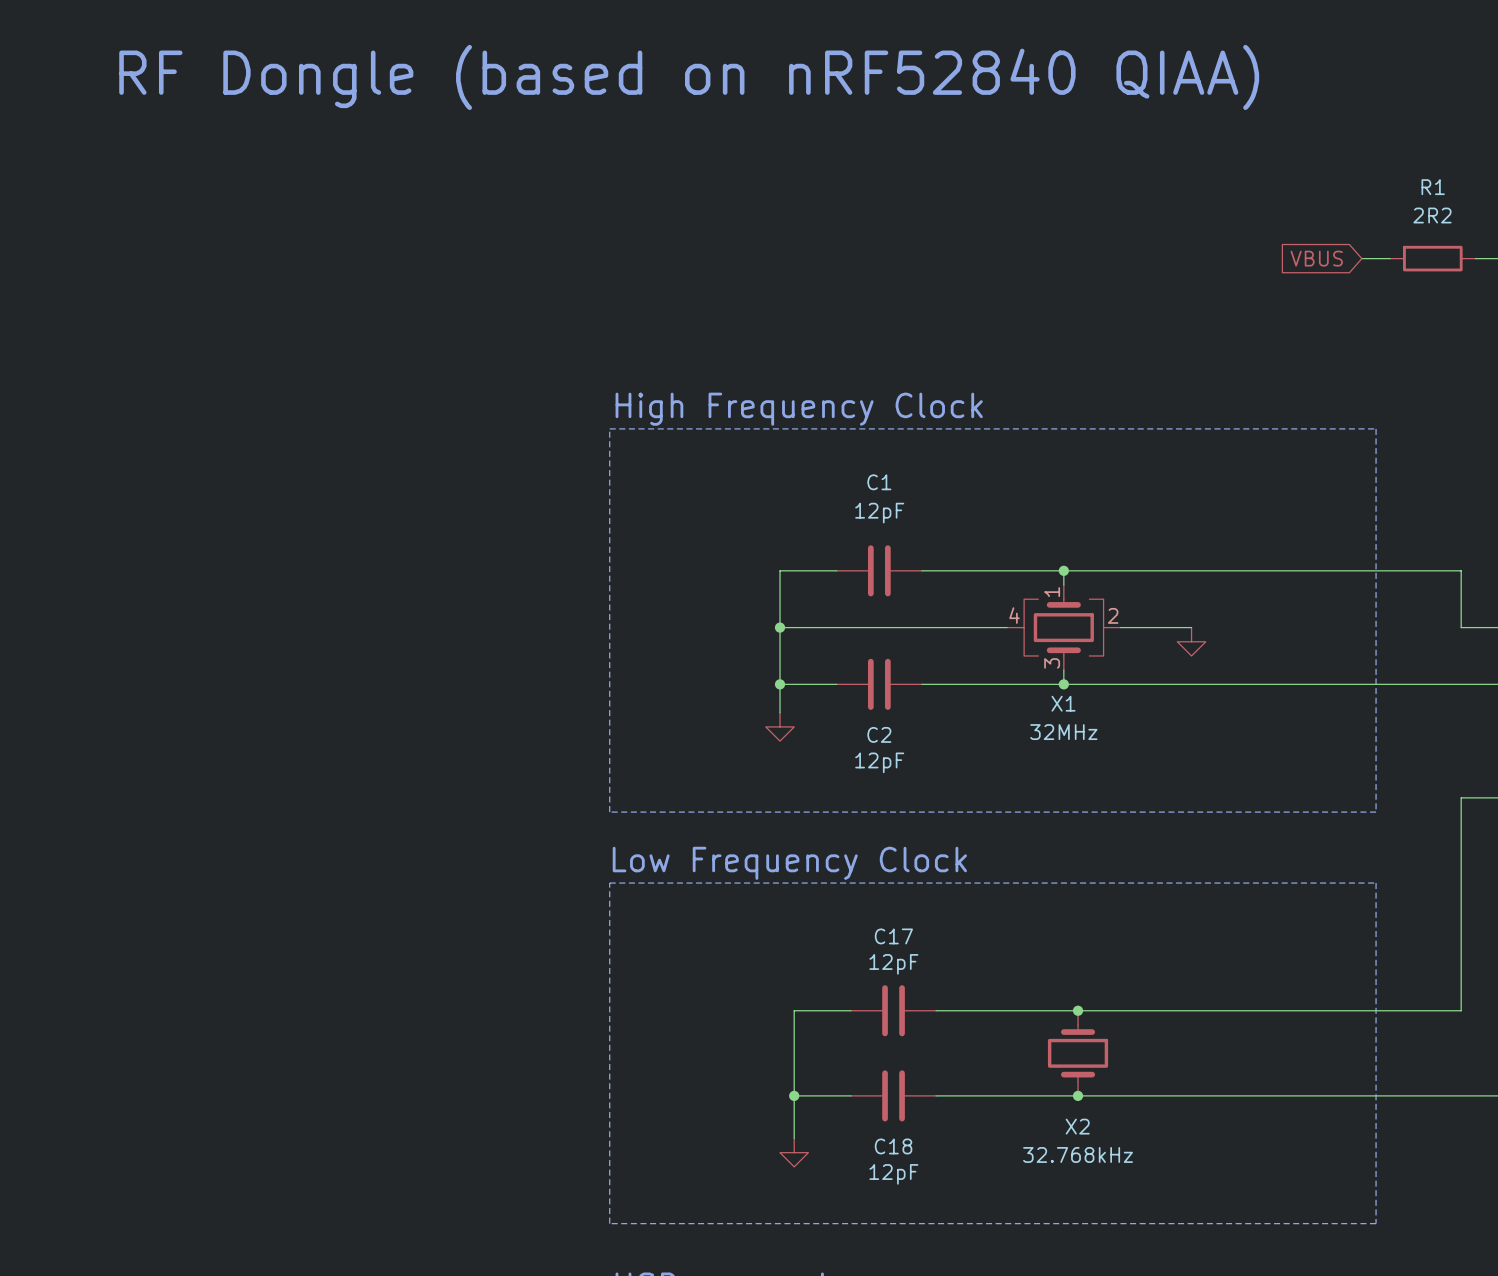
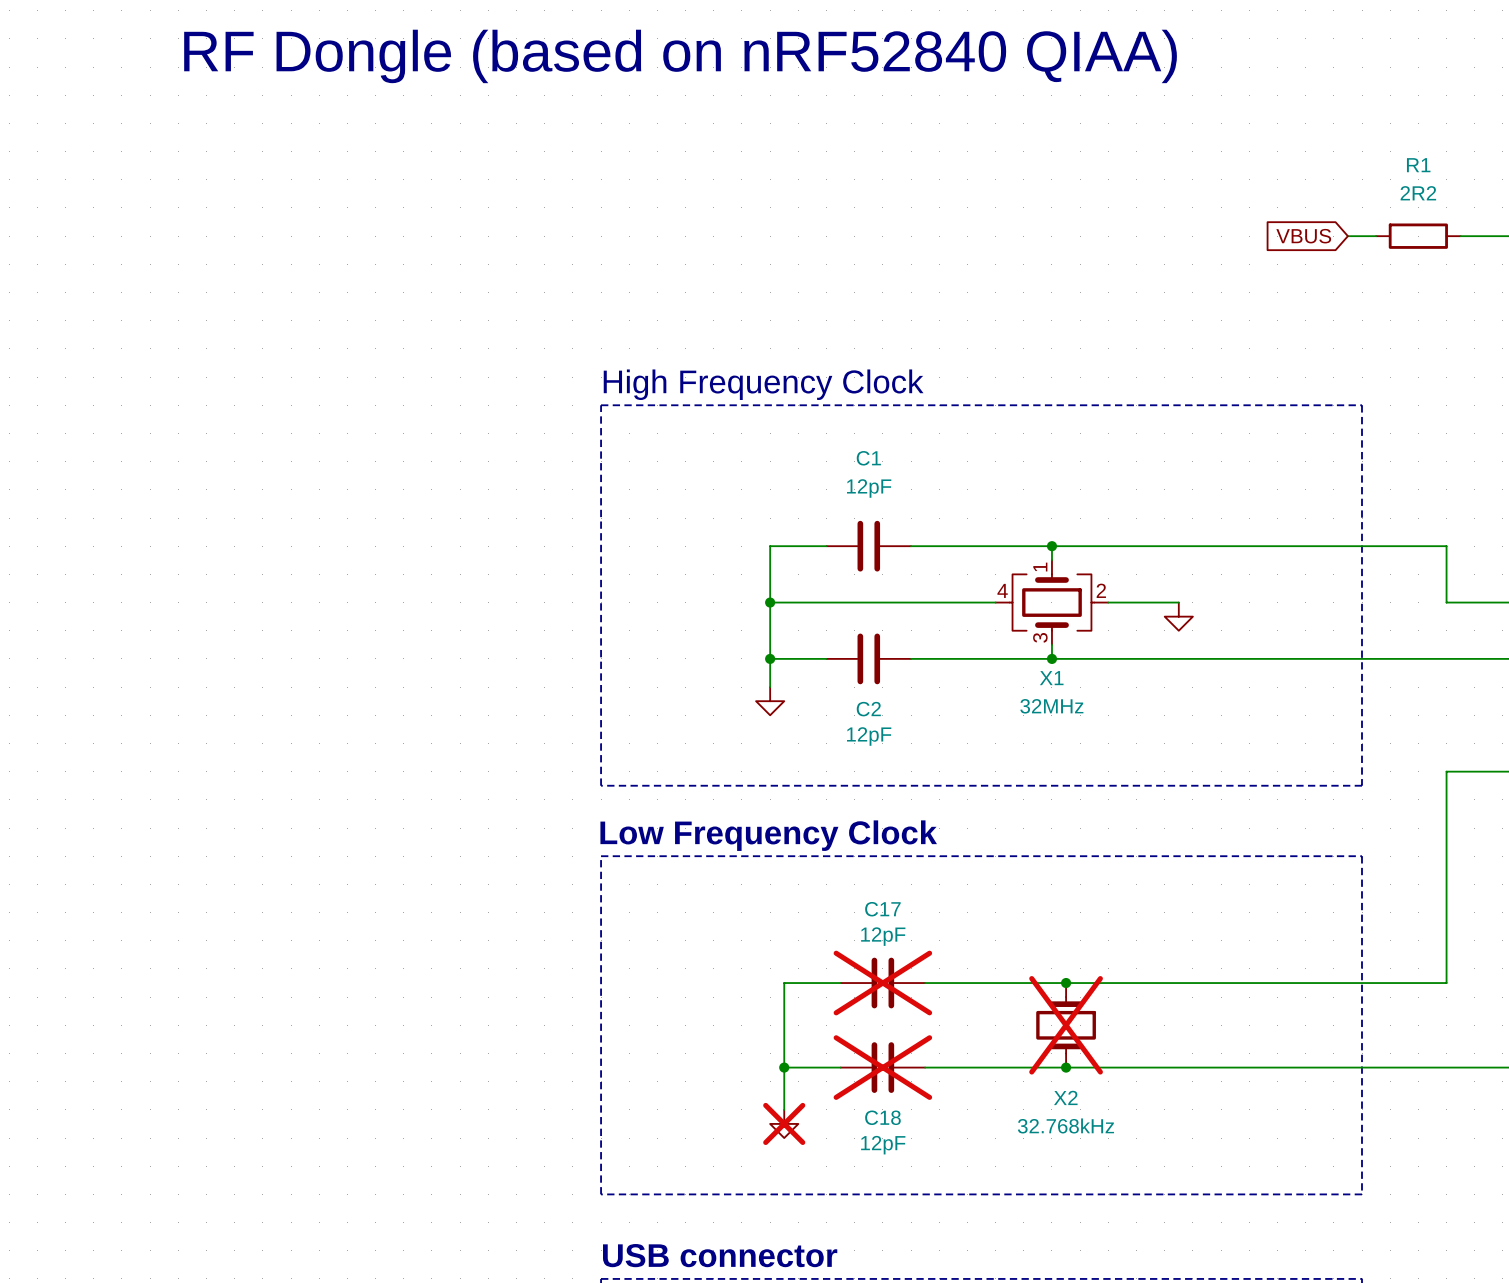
C17 do-not-place cross: none -> (882, 983)
X2 do-not-place cross: none -> (1066, 1025)
C18 do-not-place cross: none -> (882, 1067)
power symbol do-not-place cross: none -> (784, 1123)

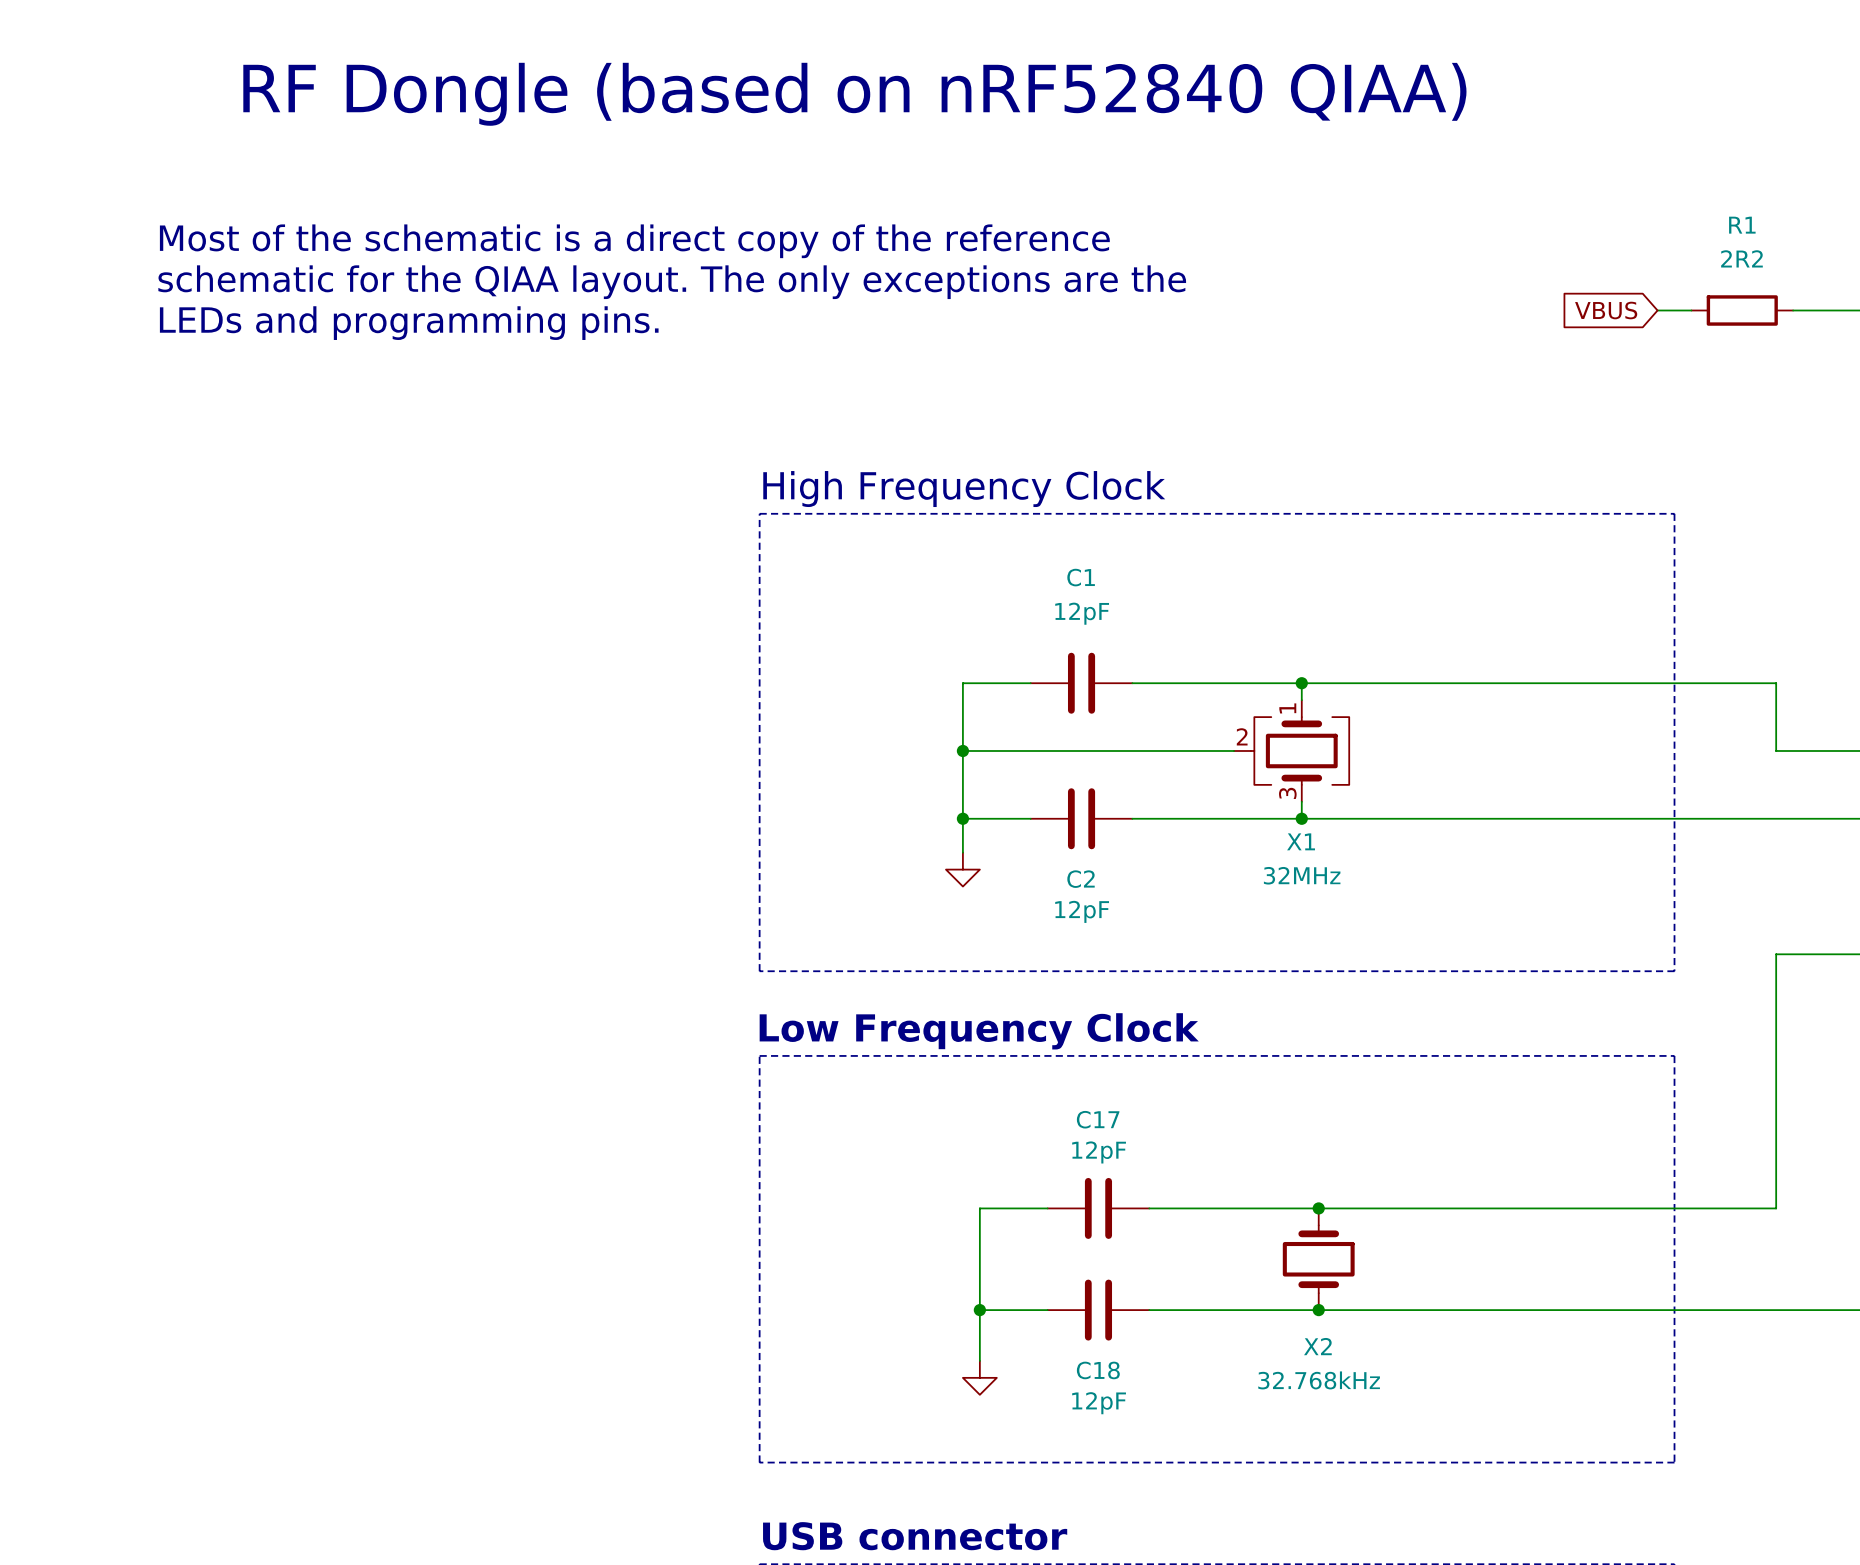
text: none -> Most of the schematic is a direct copy of the reference (634, 241)
text: none -> schematic for the QIAA layout. The only exceptions are the (672, 282)
text: none -> LEDs and programming pins. (409, 323)
X1 symbol: [995, 560, 1109, 645] -> [1234, 700, 1350, 802]
wire: (1108, 602) (1178, 602) -> none
power symbol: (1178, 616) -> none
C17 do-not-place cross: (882, 983) -> none
X2 do-not-place cross: (1066, 1025) -> none
C18 do-not-place cross: (882, 1067) -> none
power symbol do-not-place cross: (784, 1123) -> none

